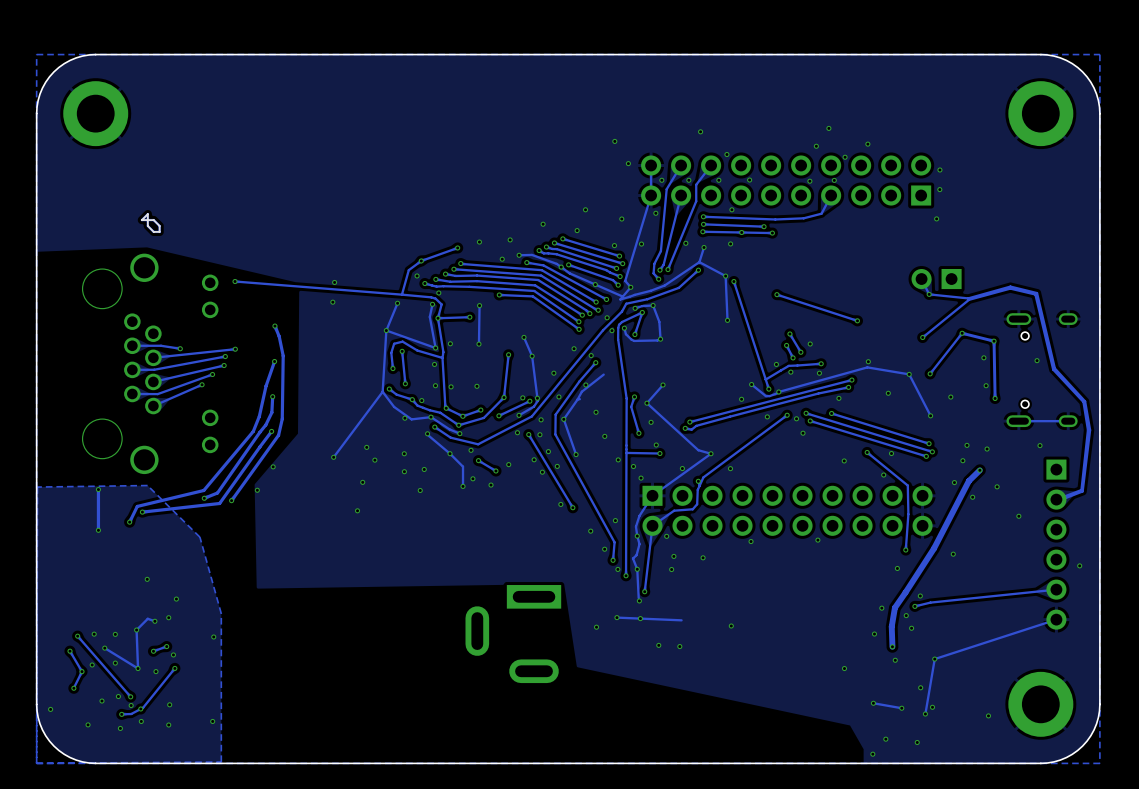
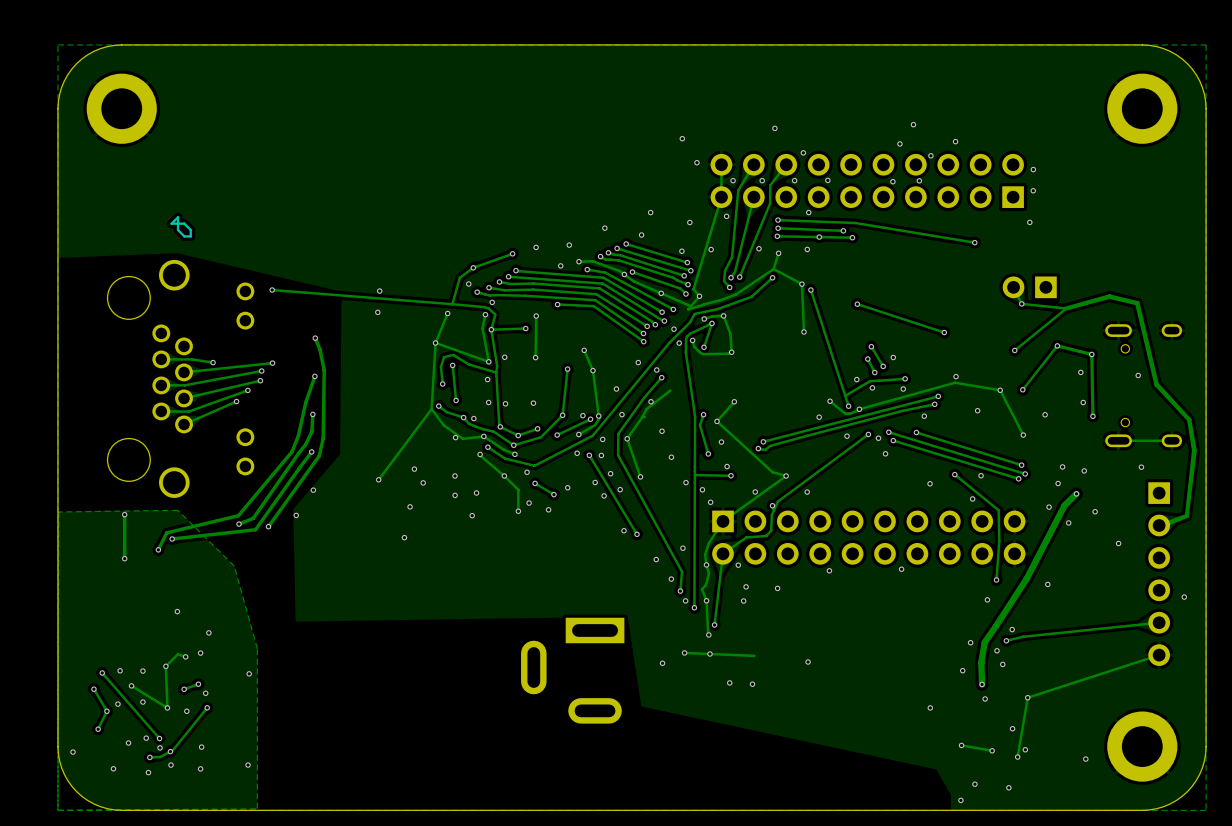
track: (831, 195) (821, 213) (803, 218) (775, 219) -> (974, 242) (855, 223)
via: none -> (974, 242)

